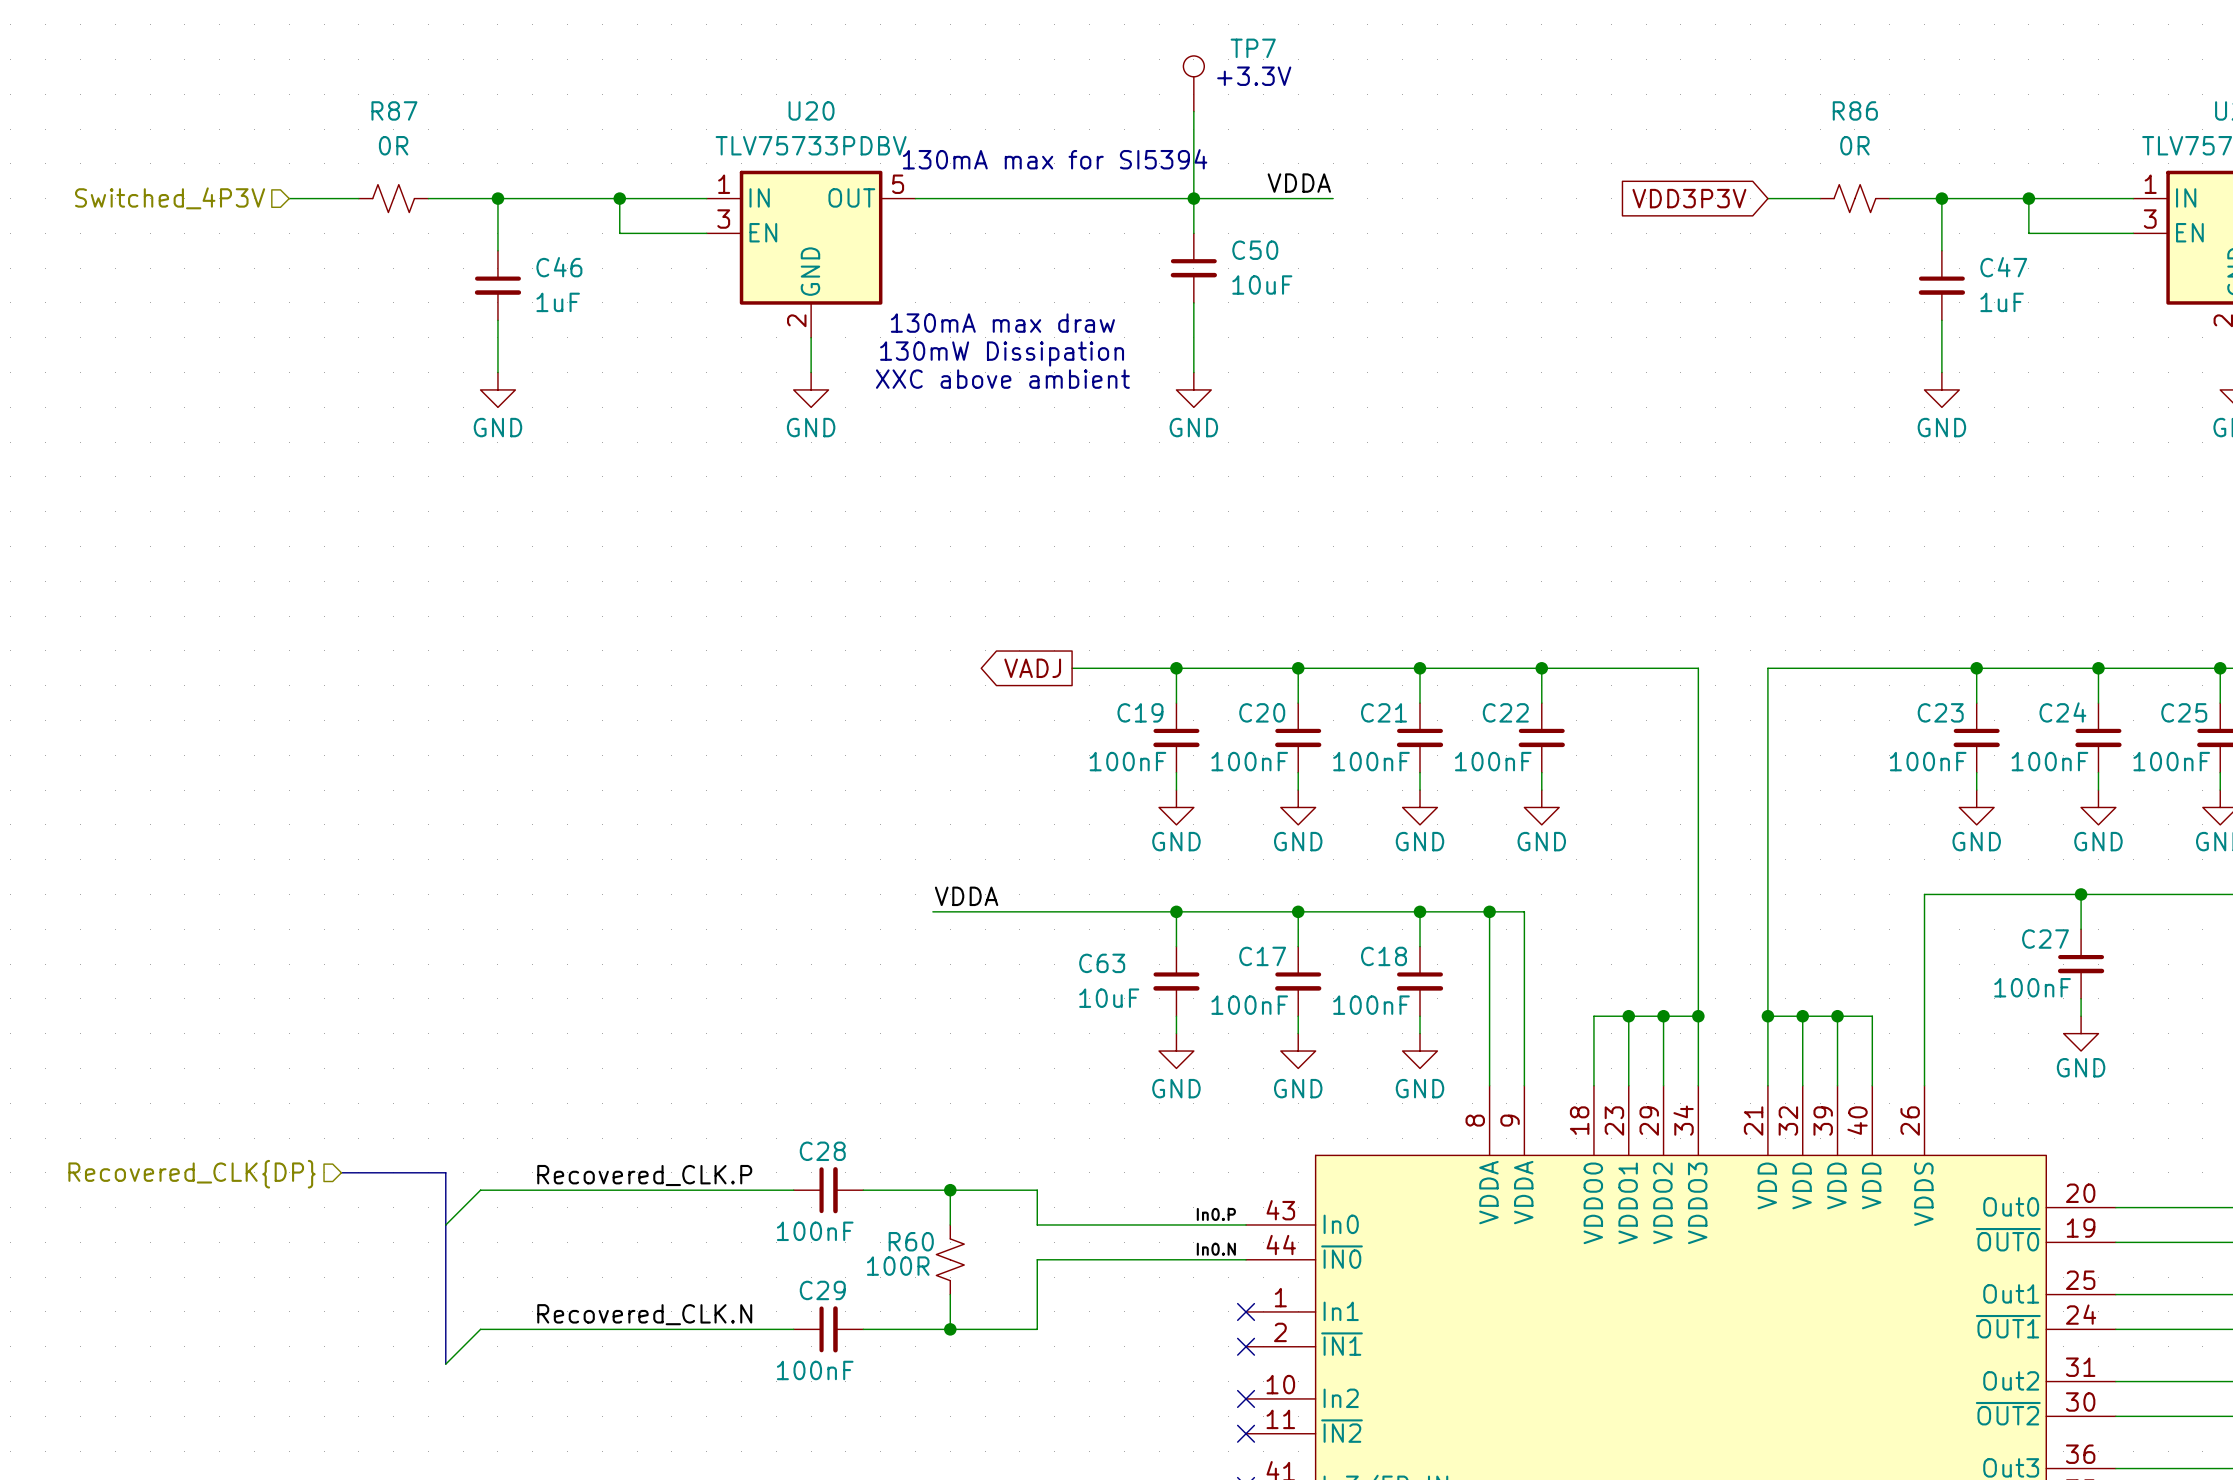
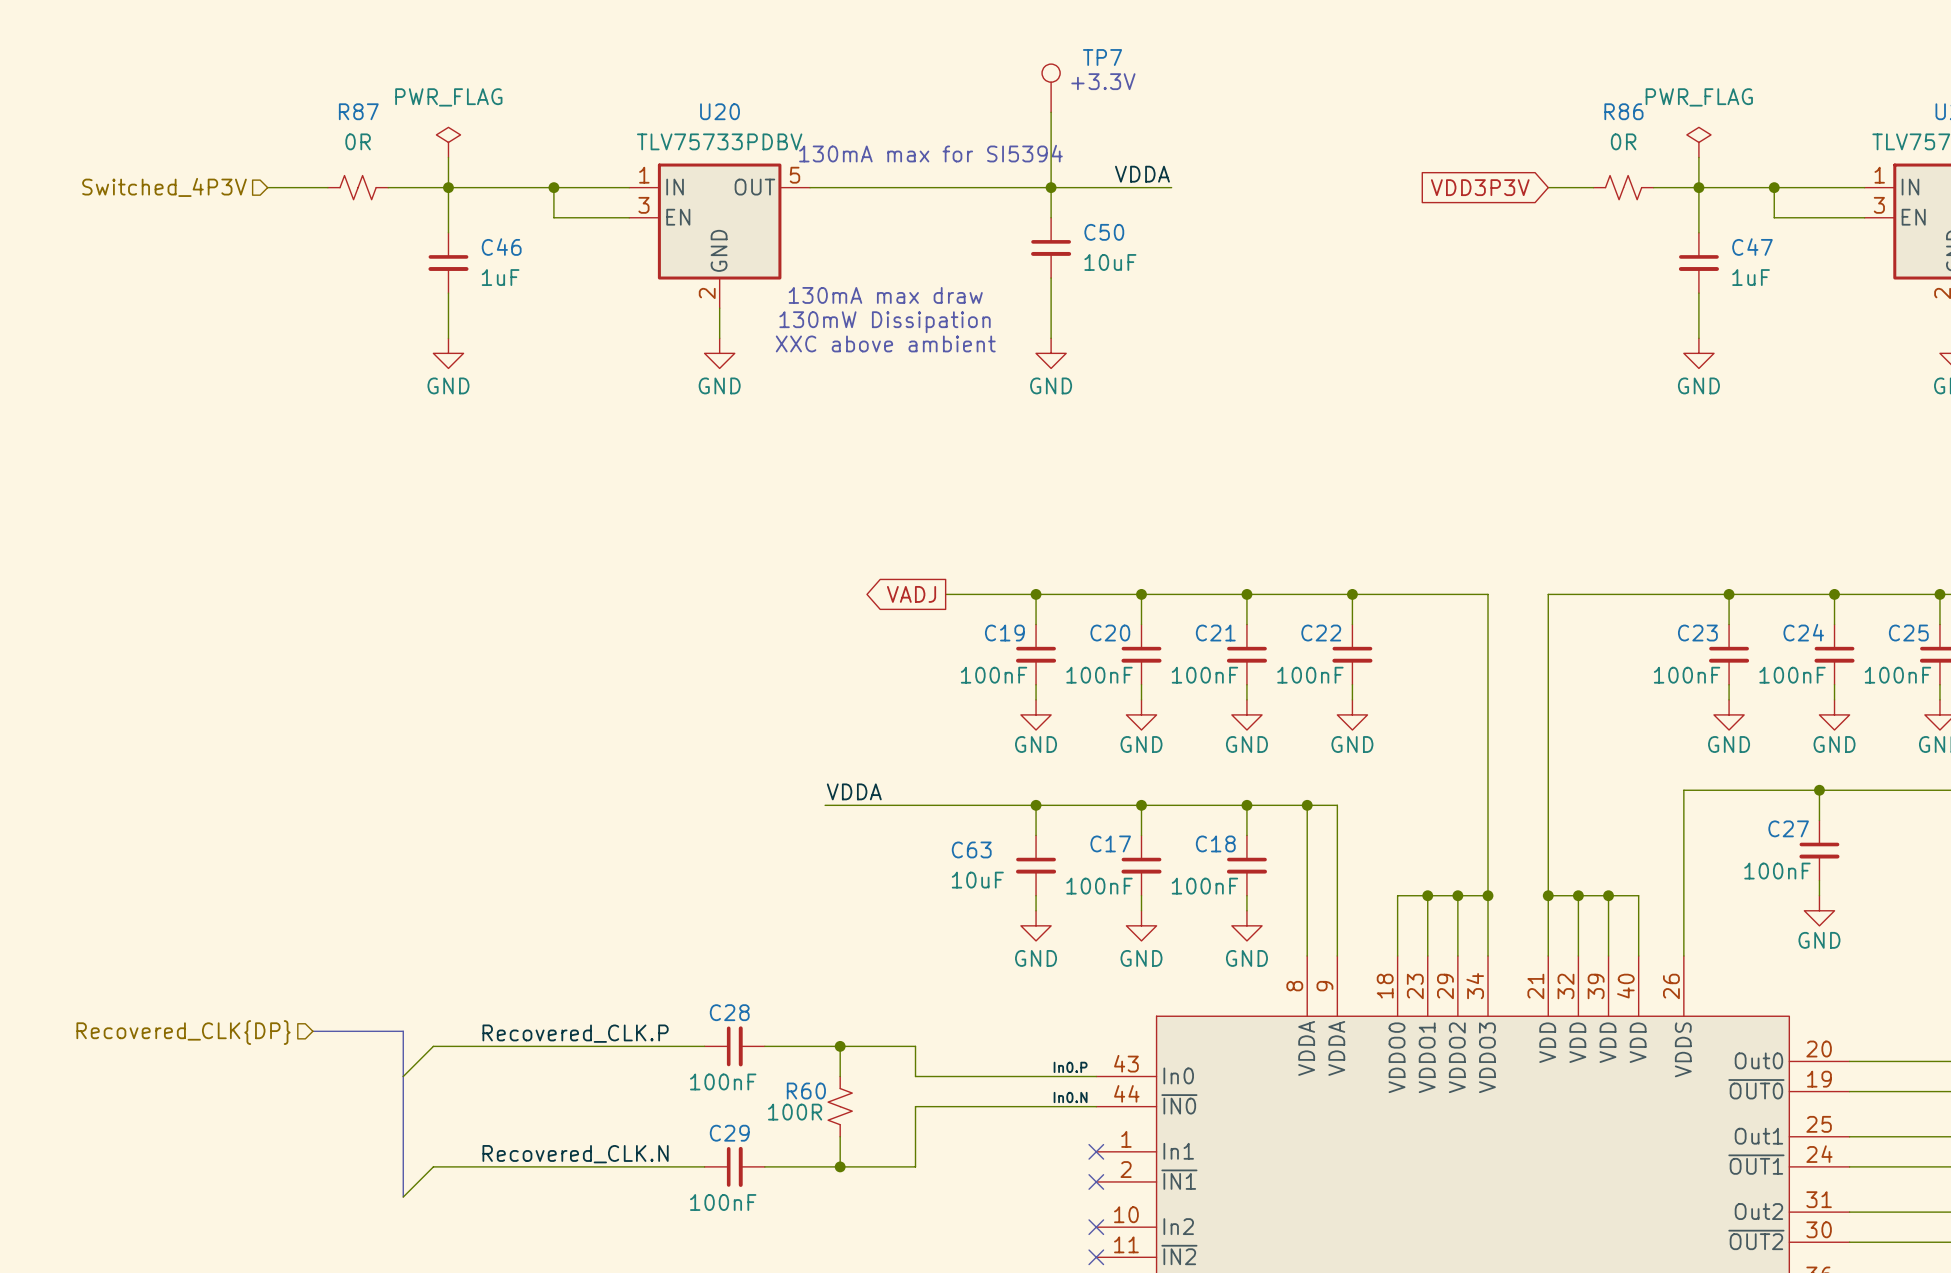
power symbol: none -> PWR_FLAG (448, 142)
power symbol: none -> PWR_FLAG (1698, 142)
wire: none -> (448, 157) (448, 187)
wire: none -> (1698, 157) (1698, 187)

